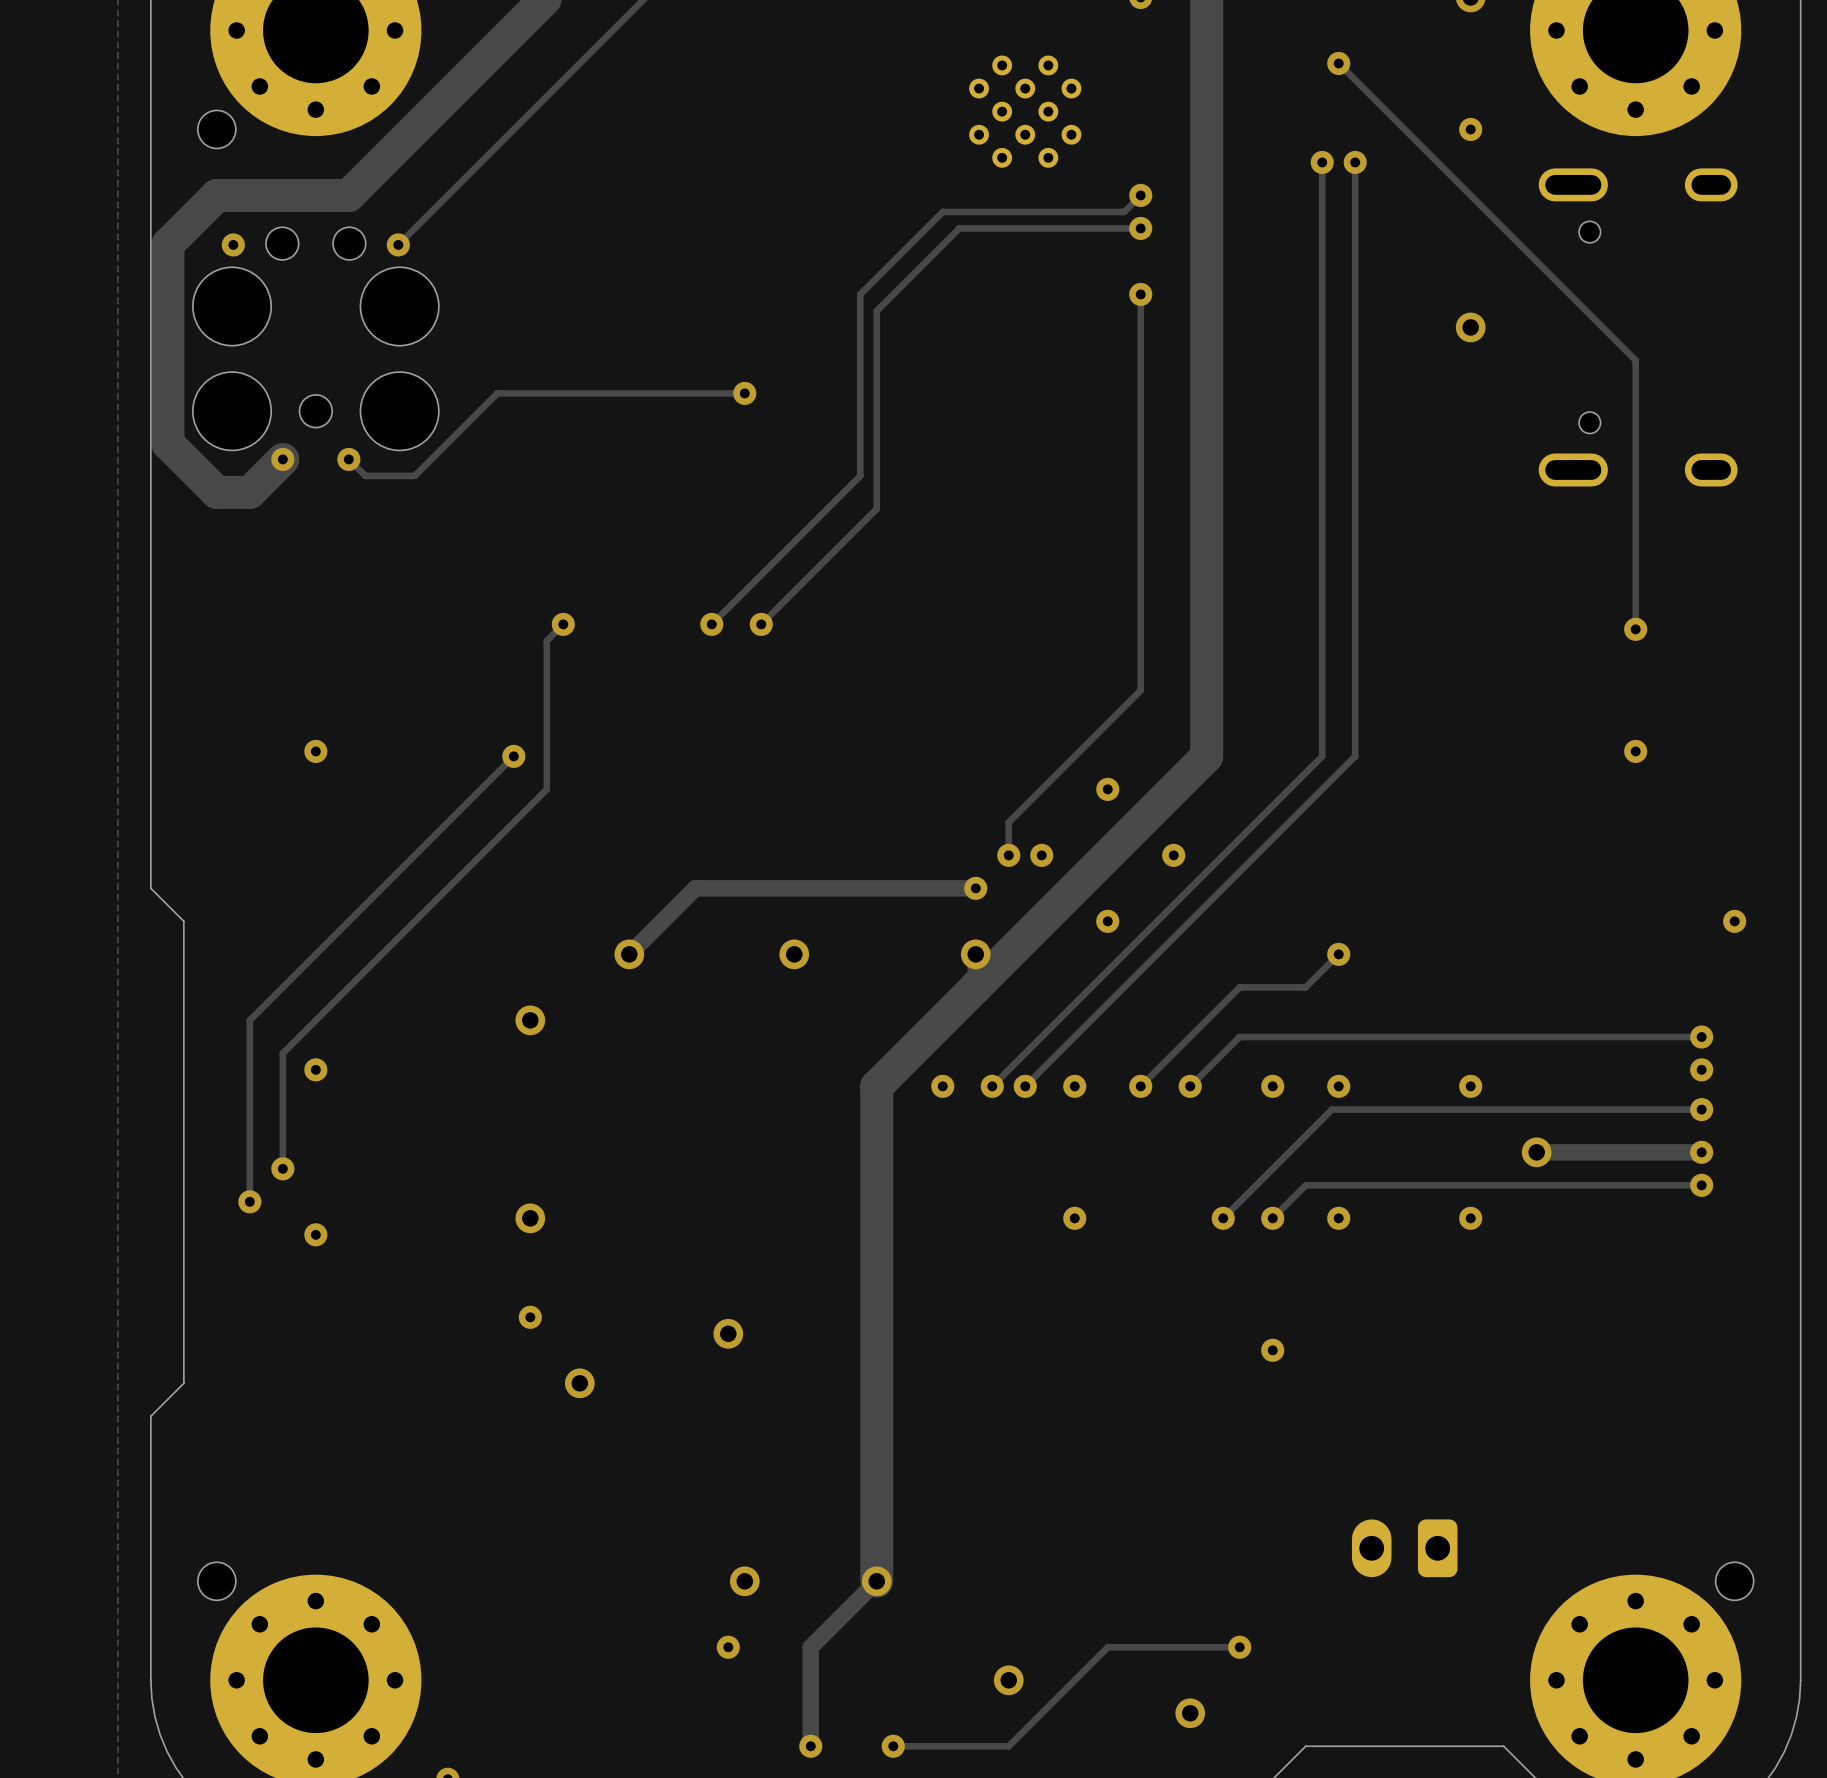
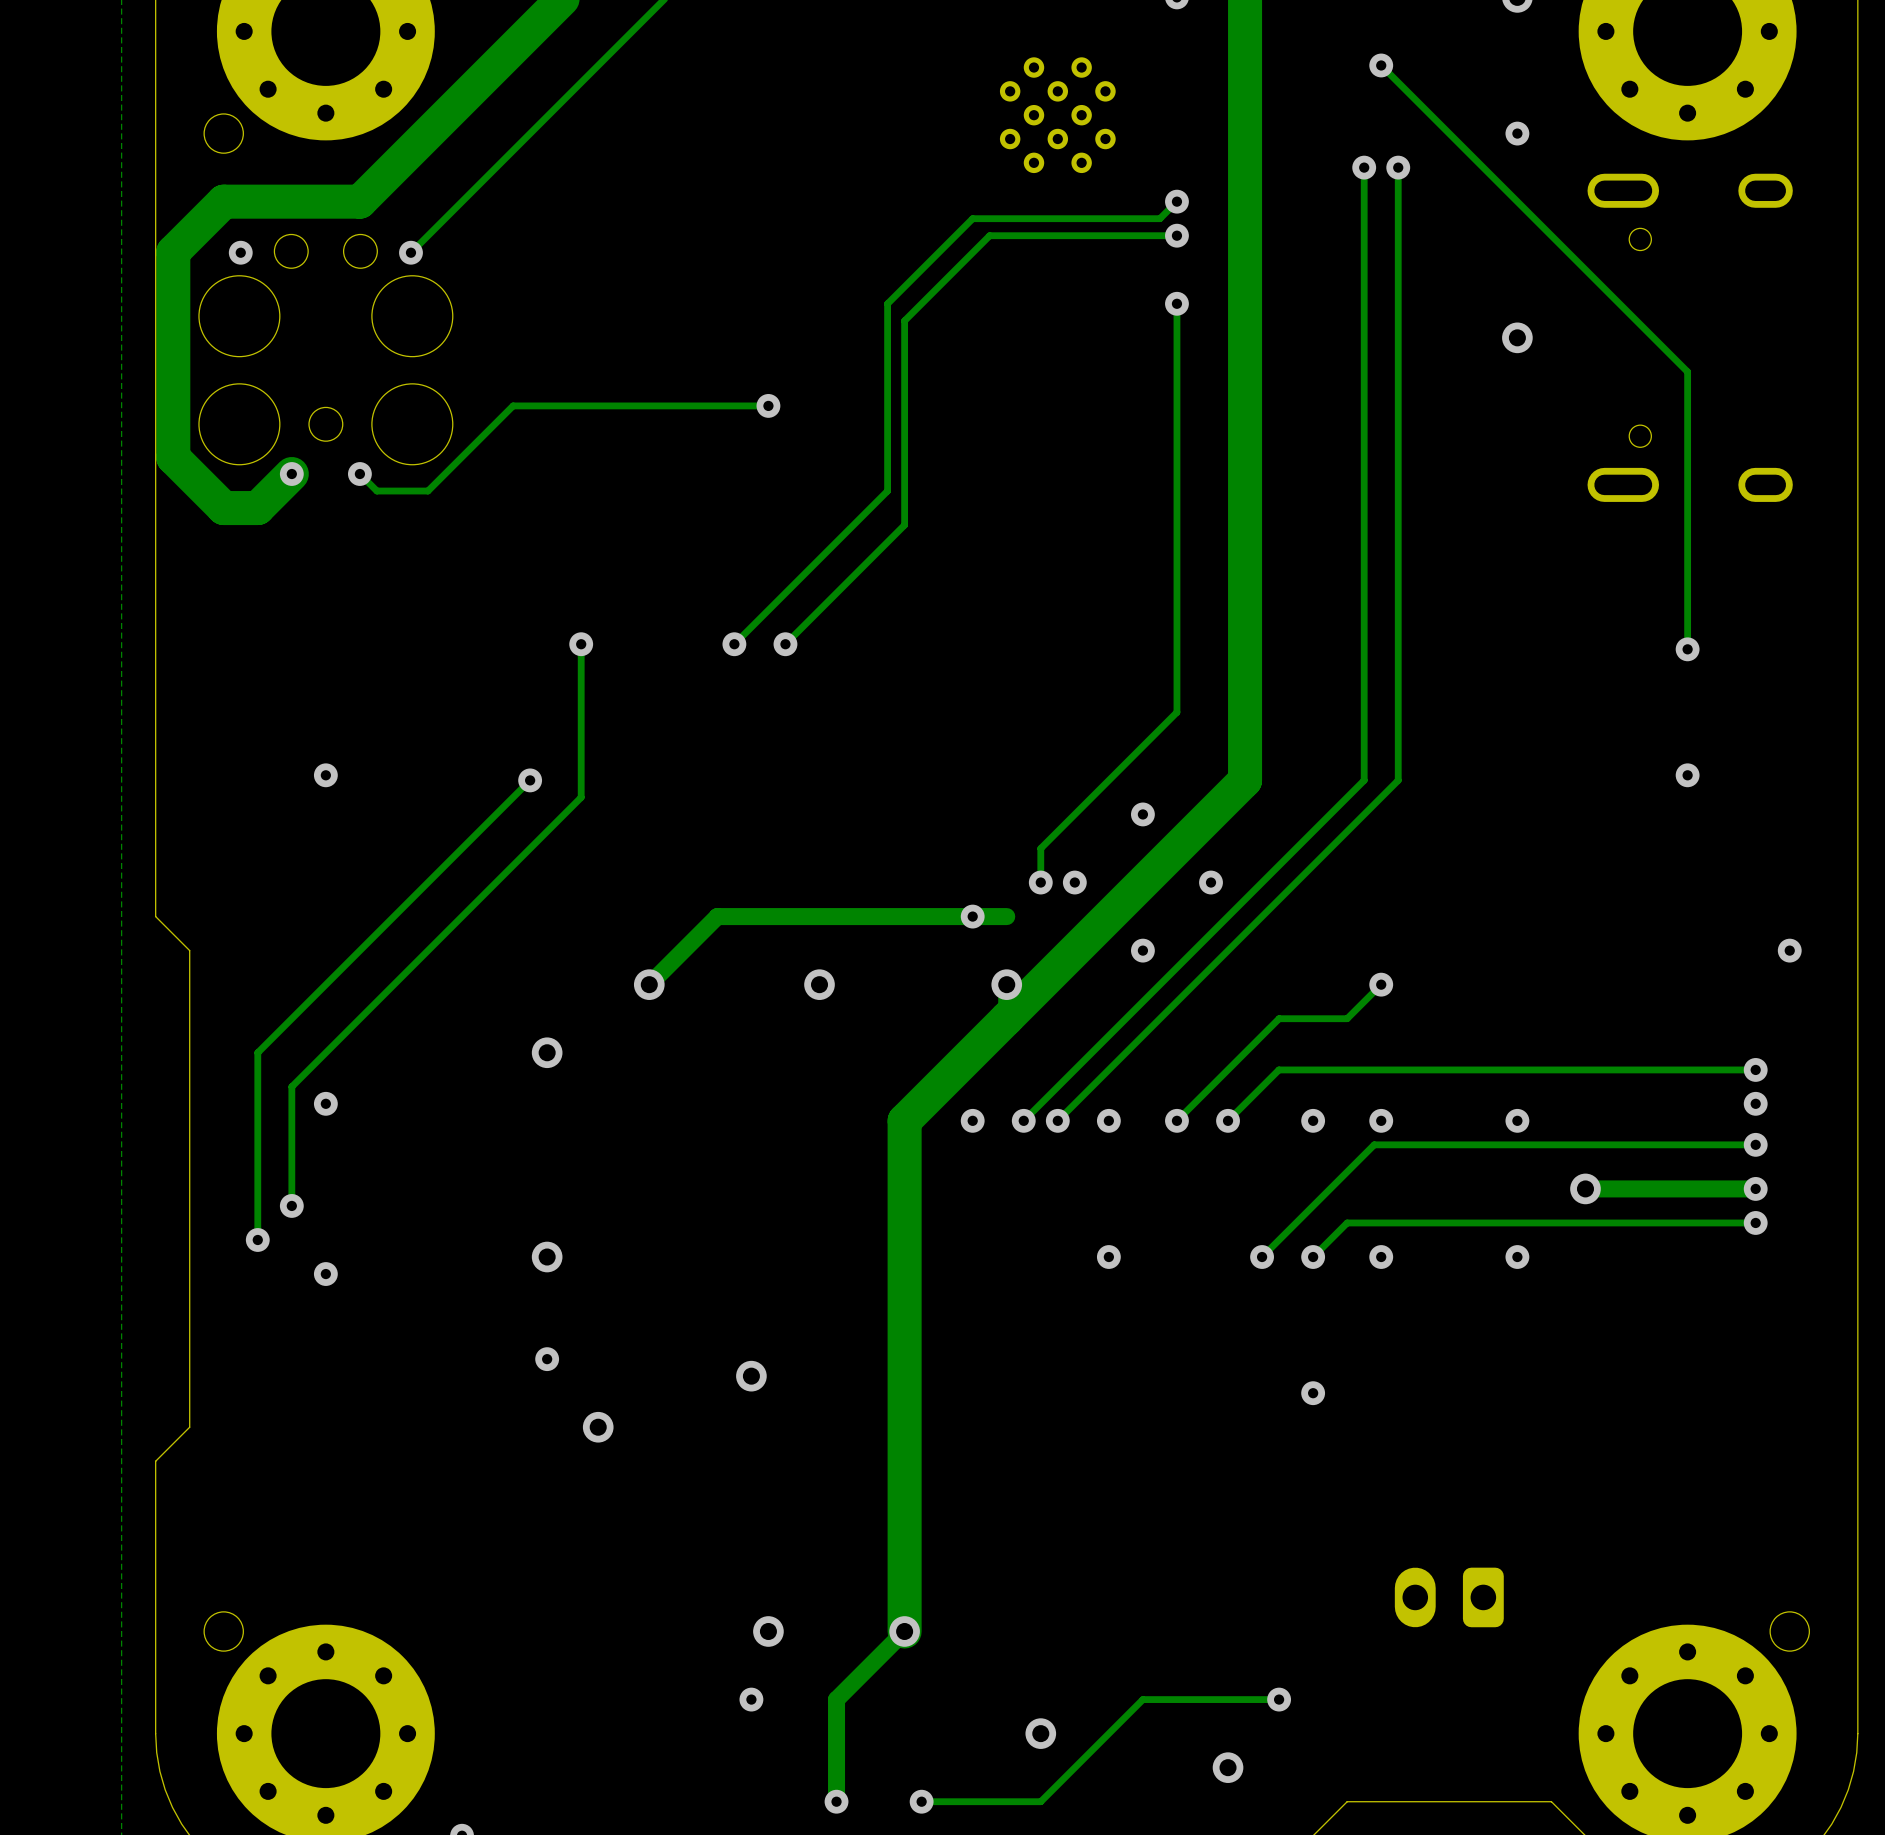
track: (563, 624) (546, 640) (546, 789) -> (581, 644) (581, 797) (564, 814)
via position: (975, 888) -> (972, 916)

